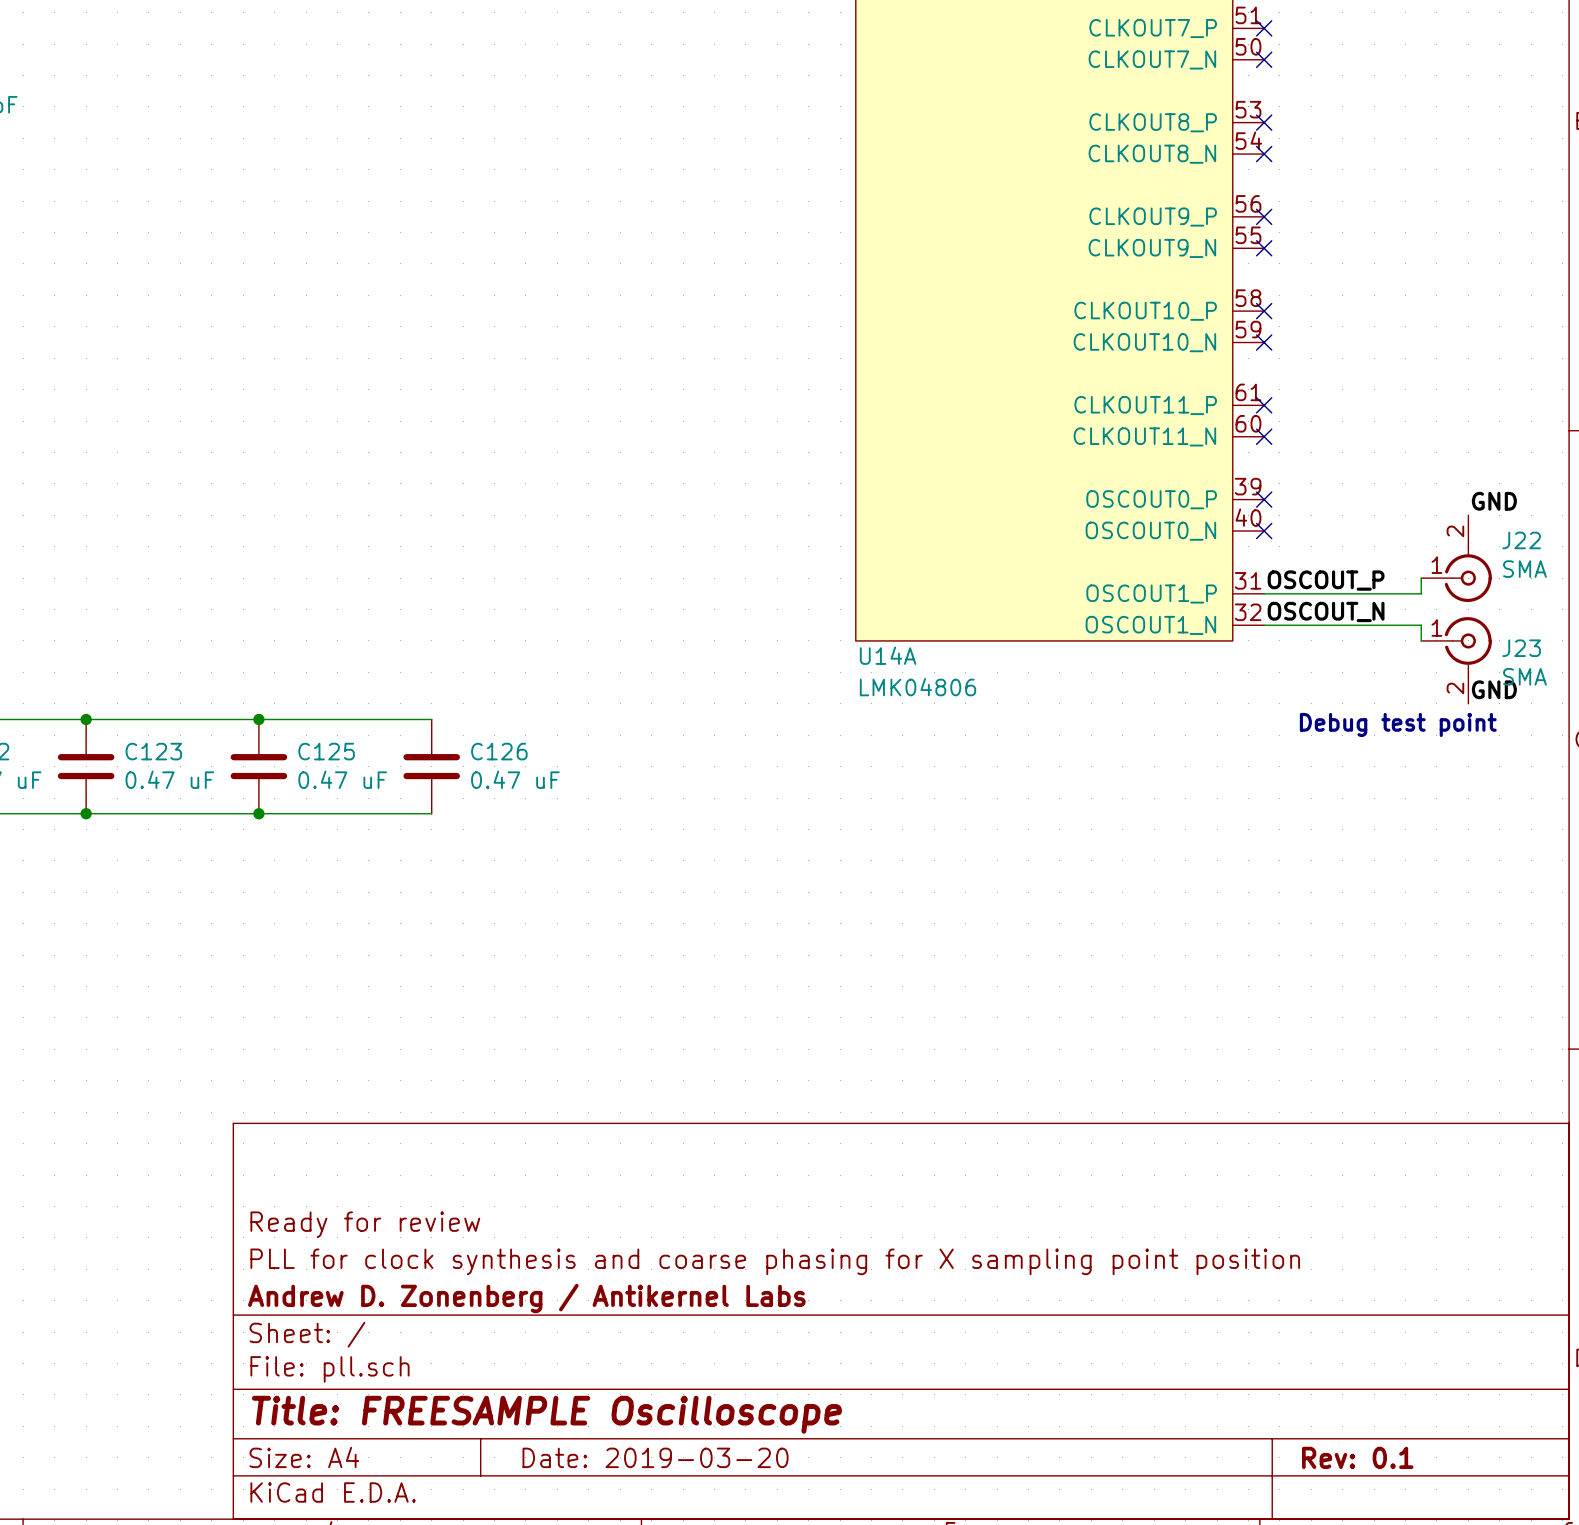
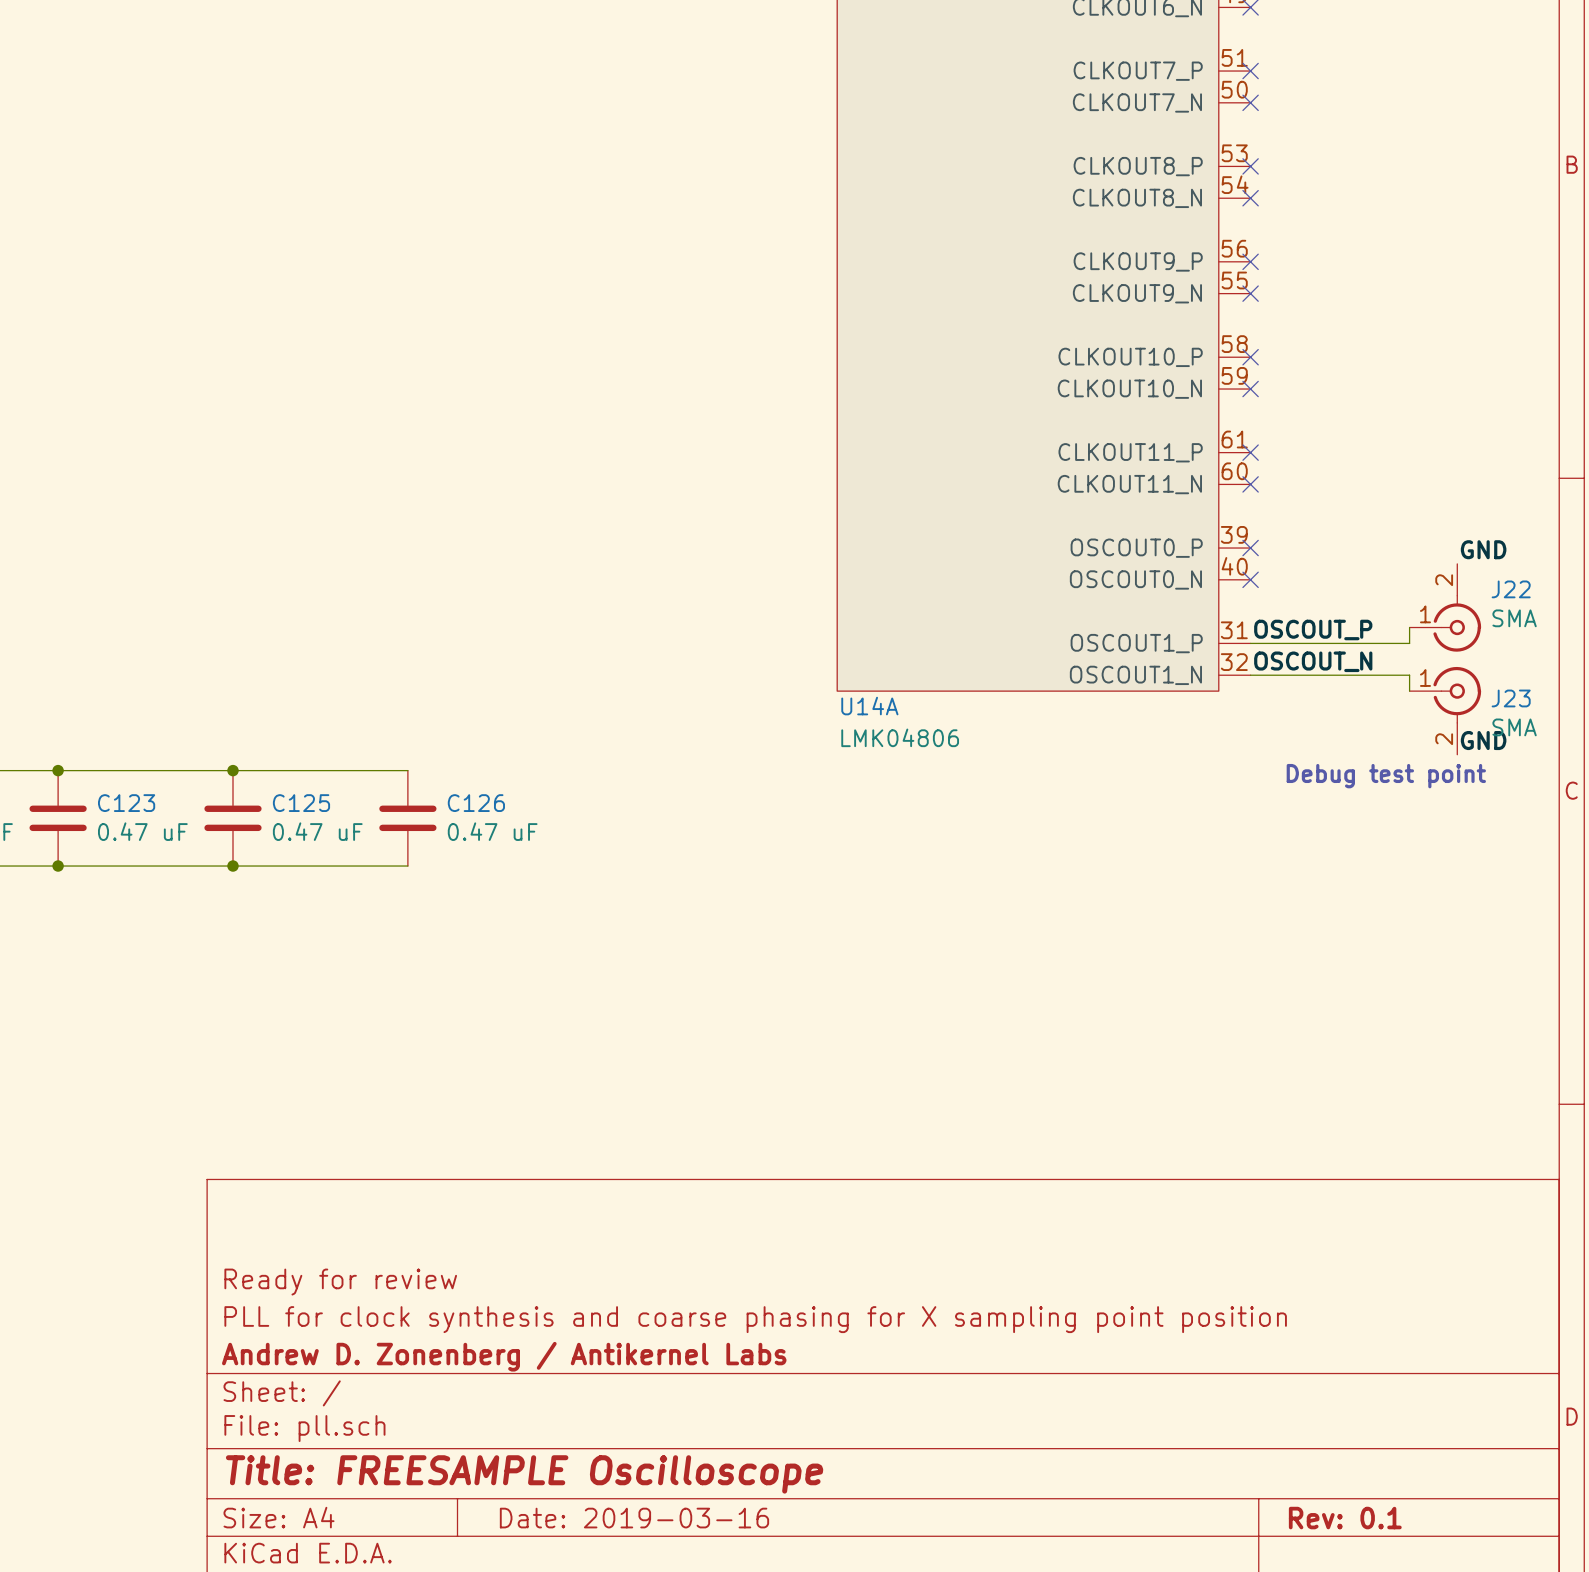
title block: Date: 2019-03-20 (655, 1457) -> Date: 2019-03-16 (634, 1518)

